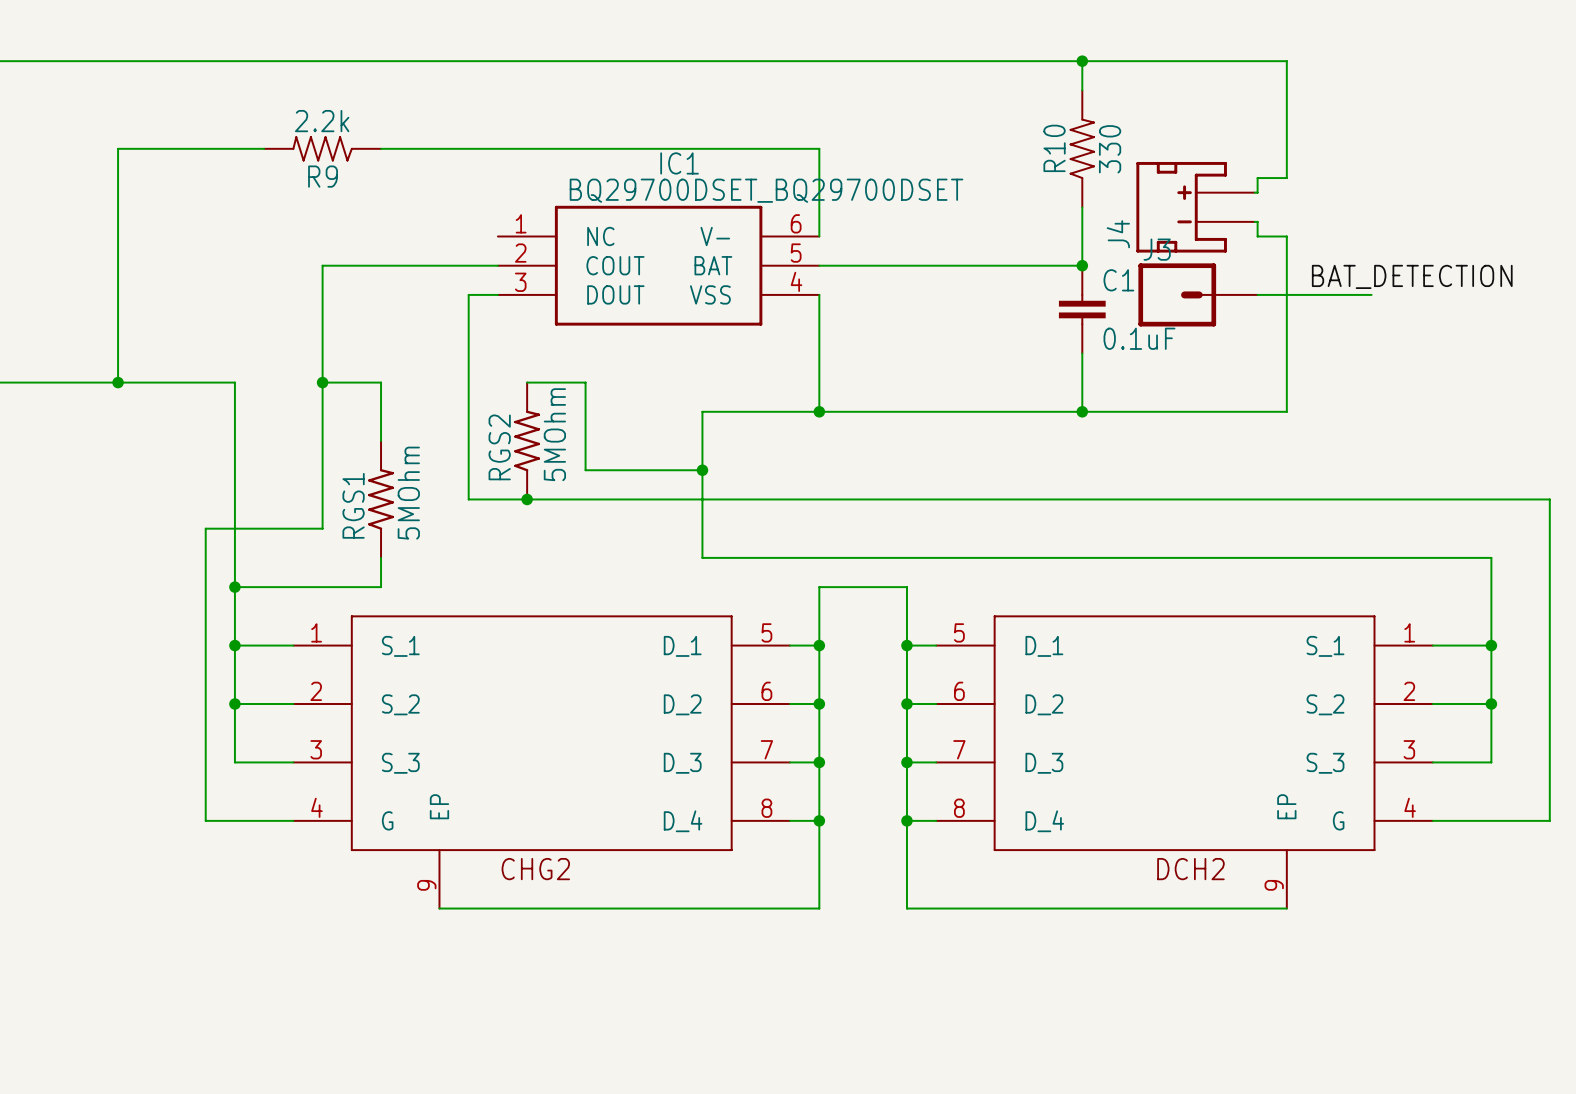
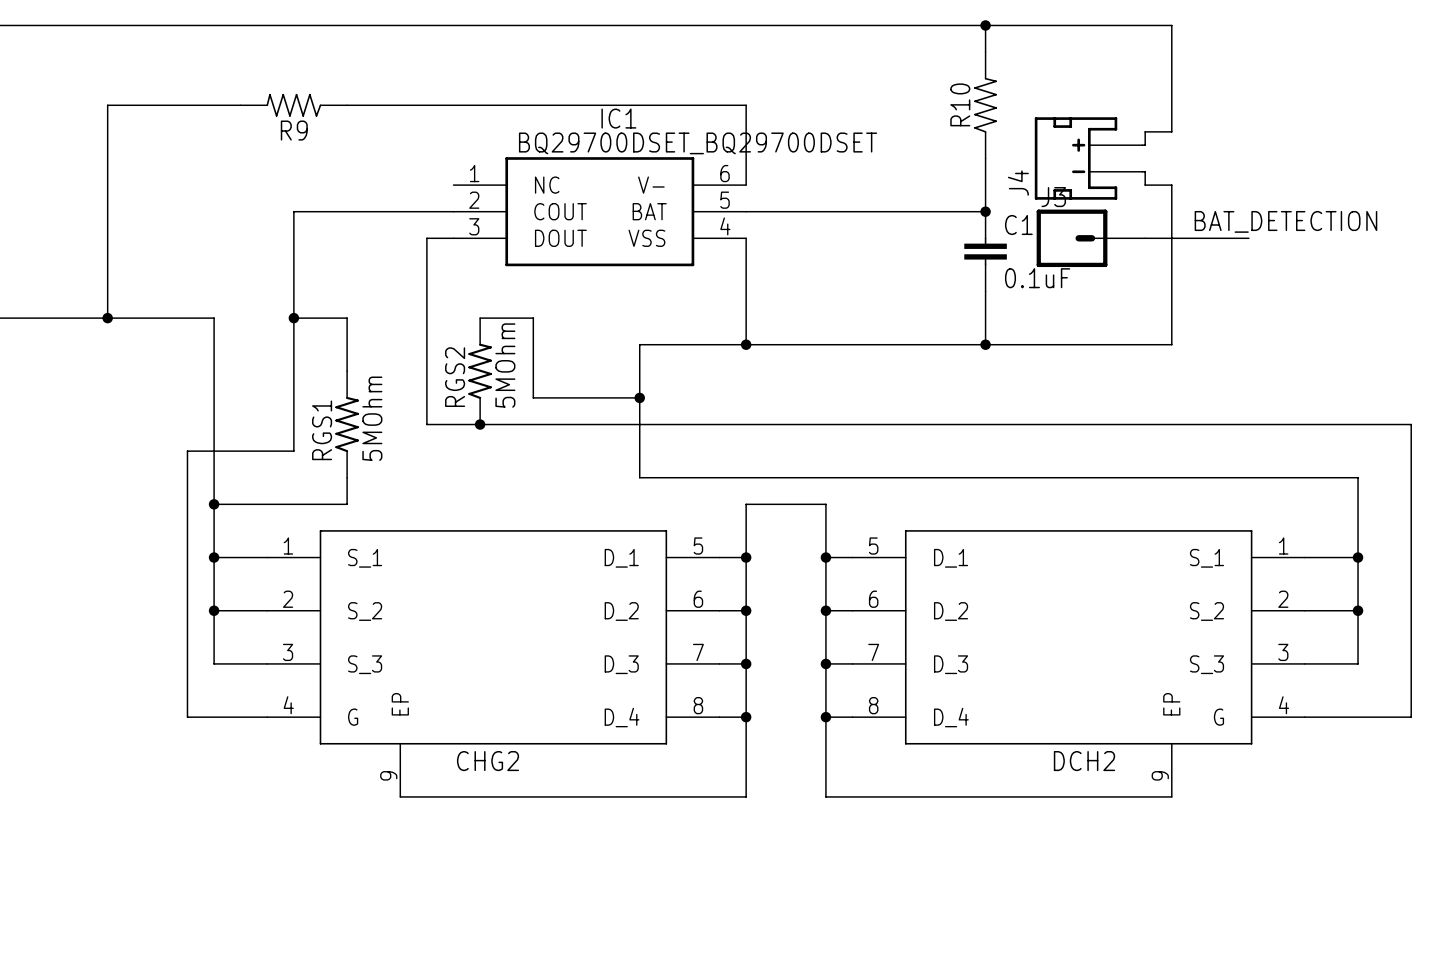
R9 value: 2.2k (322, 121) -> none
R10 value: 330 (1110, 149) -> none

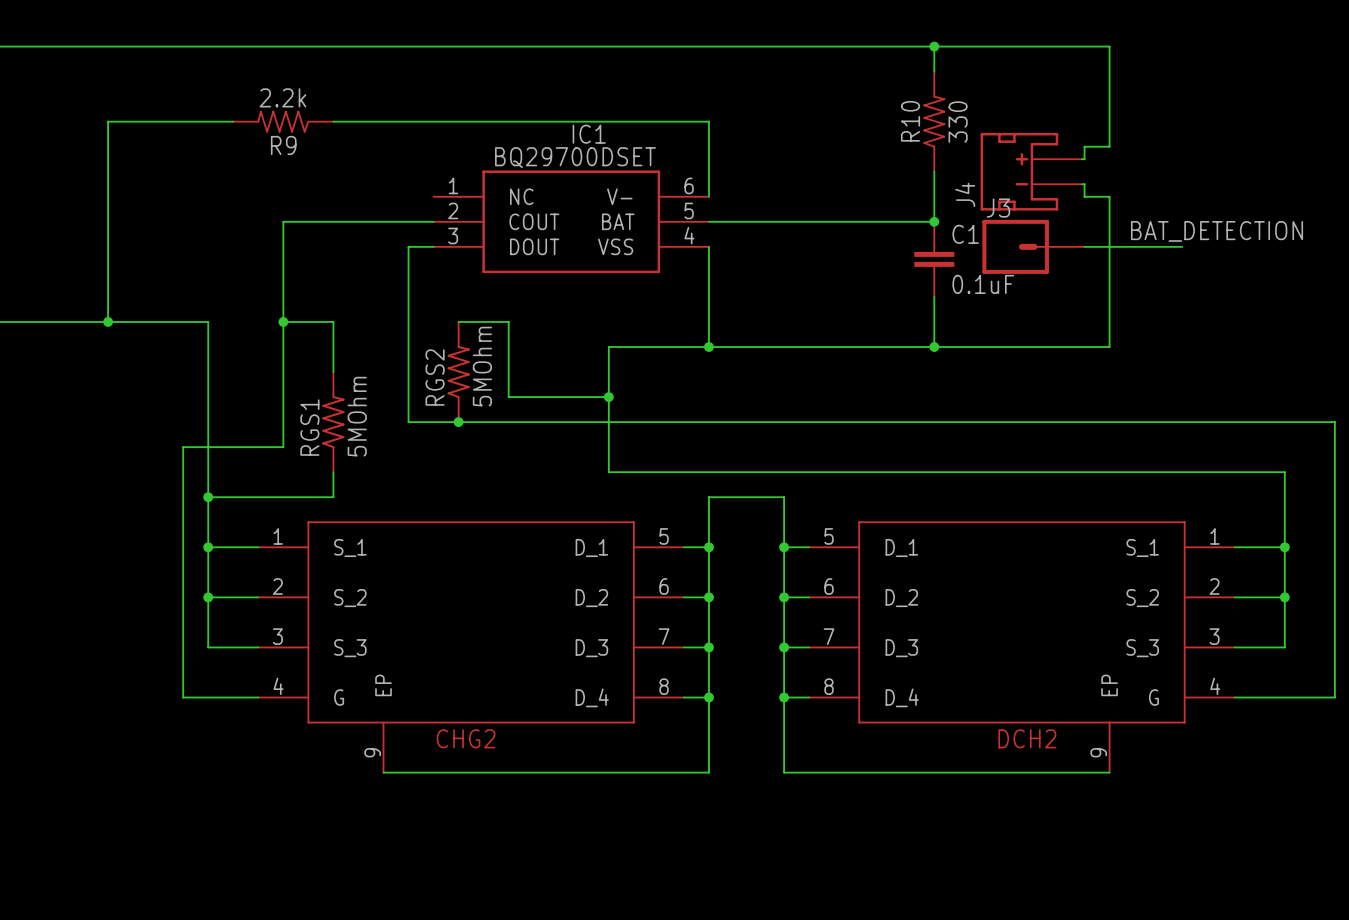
R9 value: none -> 2.2k (282, 97)
R10 value: none -> 330 (958, 122)
IC1 value: BQ29700DSET_BQ29700DSET (698, 143) -> BQ29700DSET (575, 157)

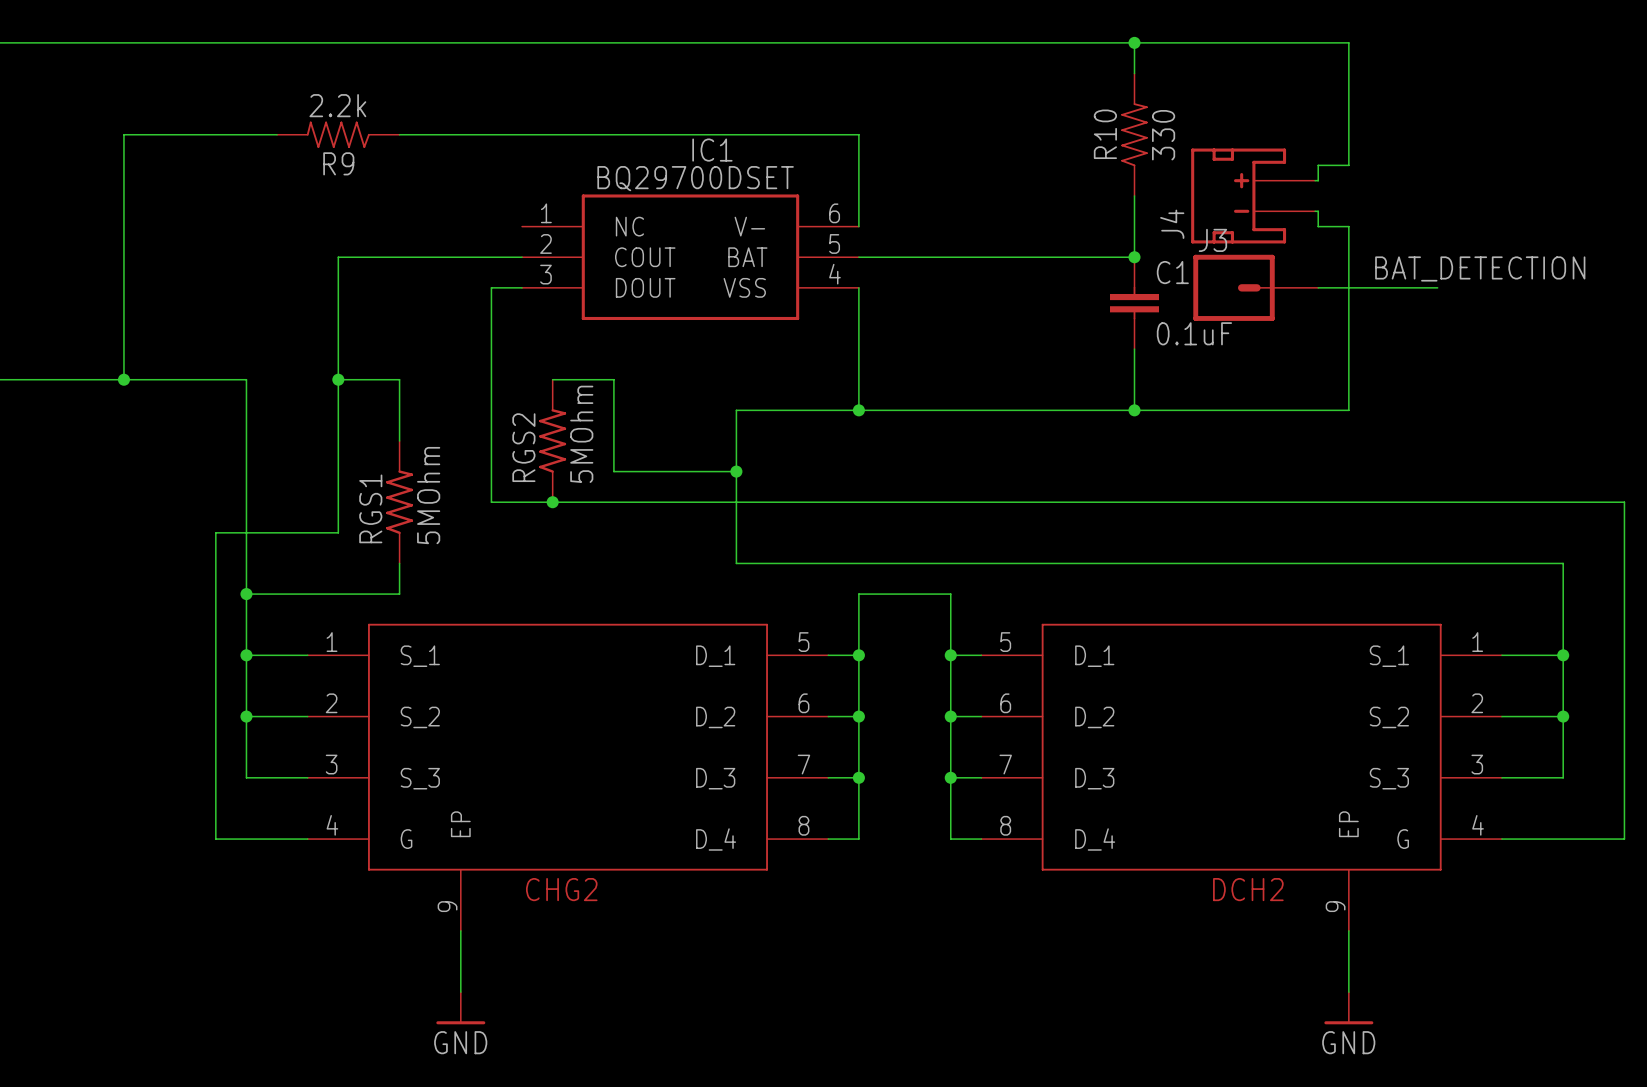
wire: (708, 697) (708, 772) (383, 772) -> (460, 992) (460, 930)
junction: (708, 697) -> none
wire: (784, 697) (784, 772) (1109, 772) -> (1348, 992) (1348, 930)
junction: (784, 697) -> none
power symbol: none -> GND (460, 1008)
power symbol: none -> GND (1348, 1008)

